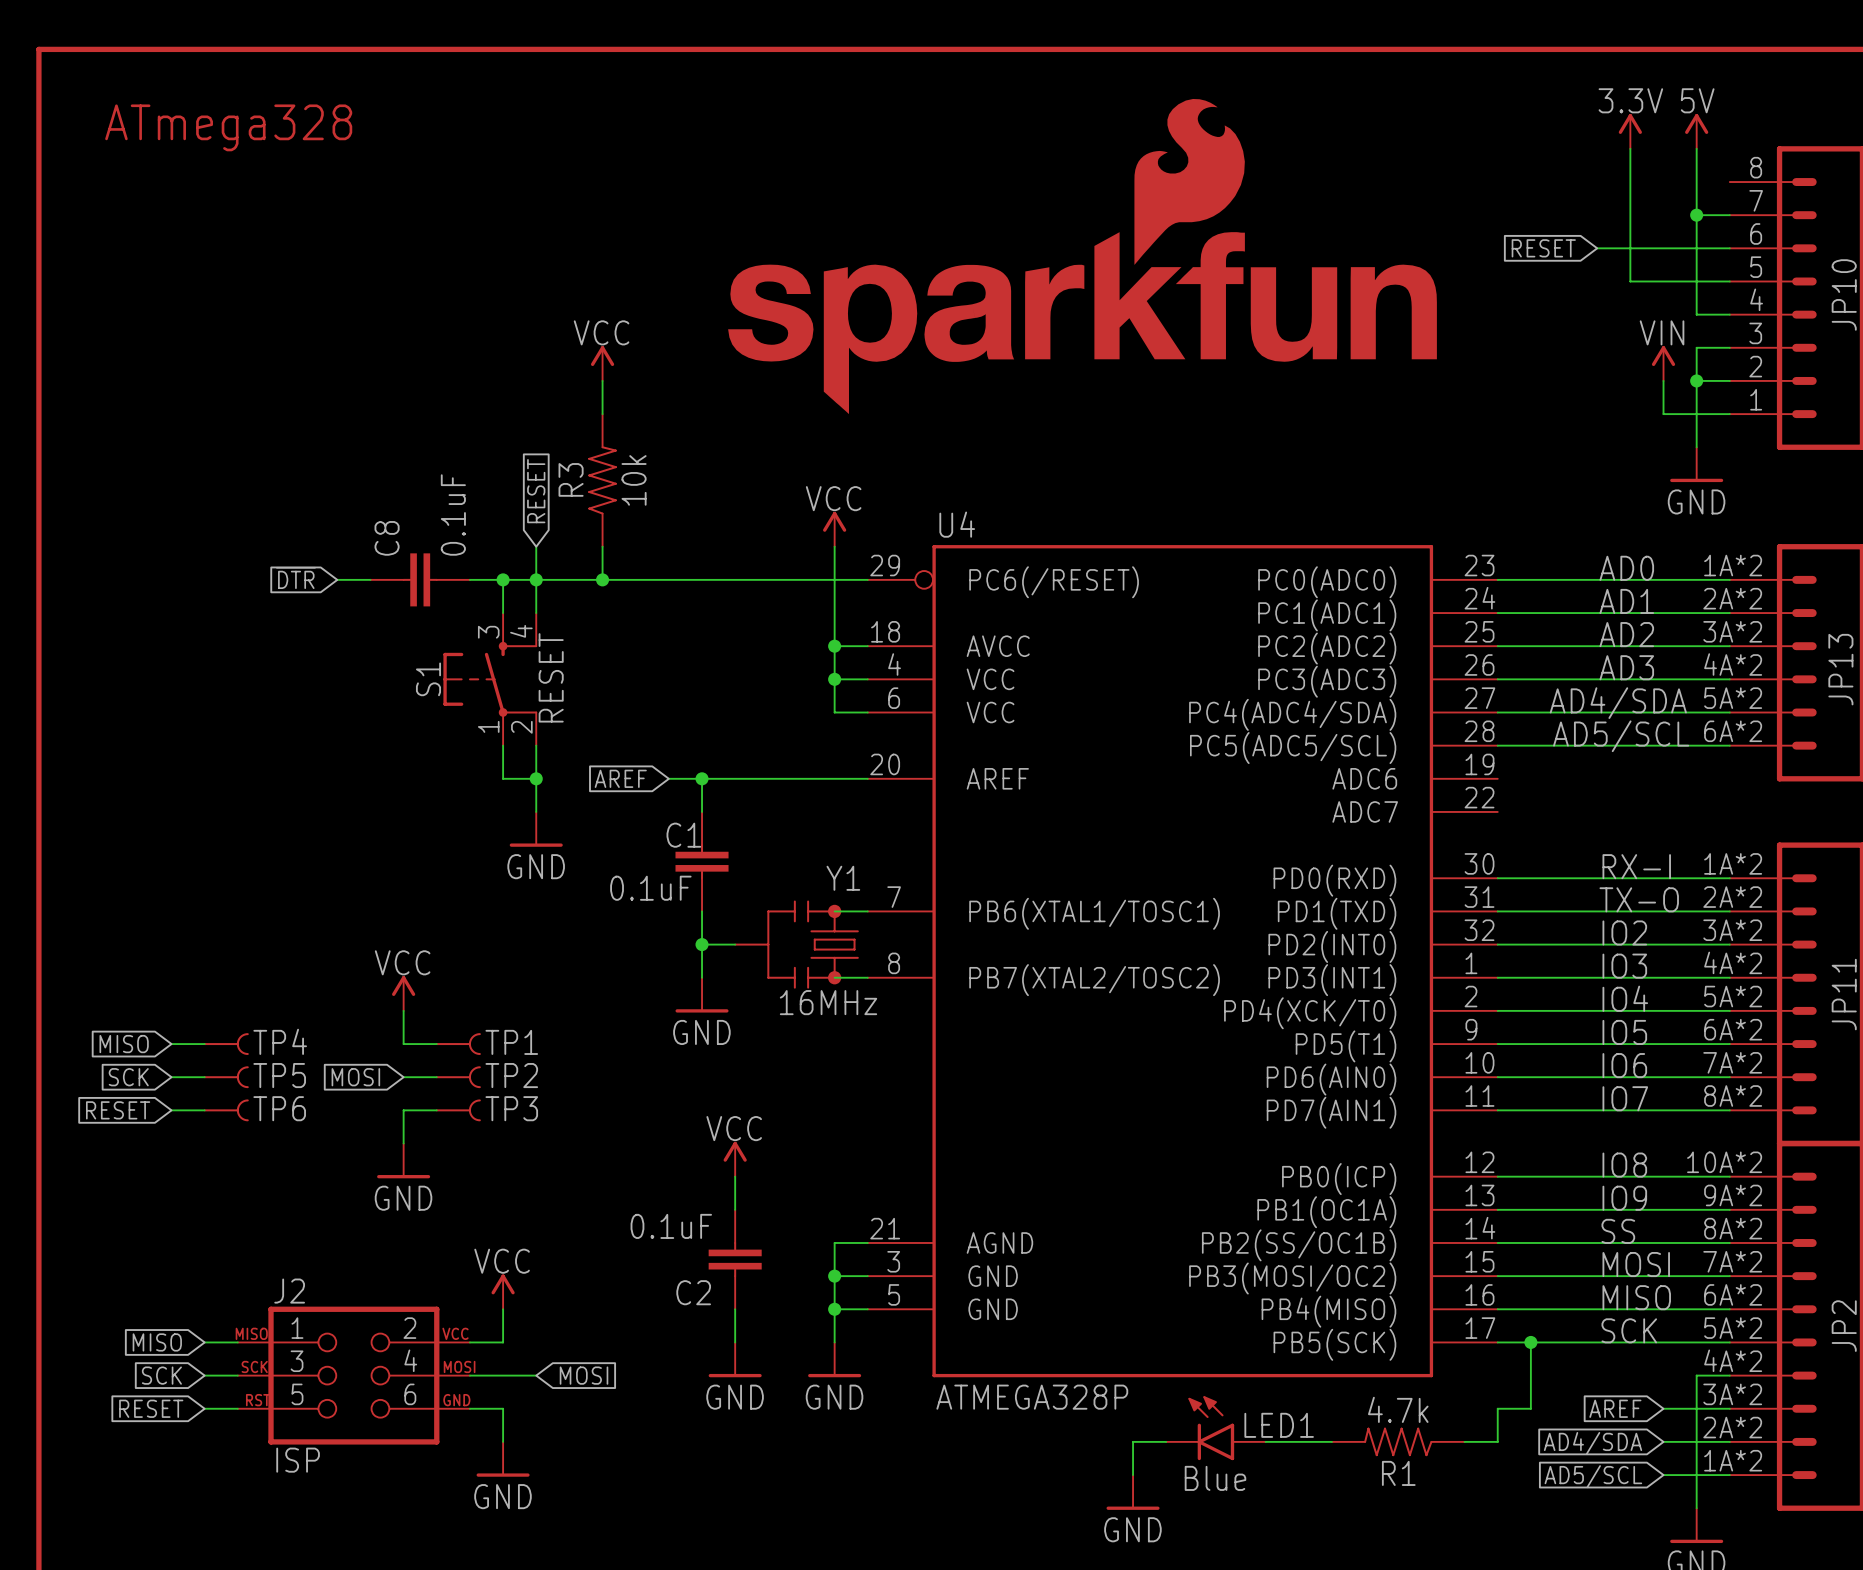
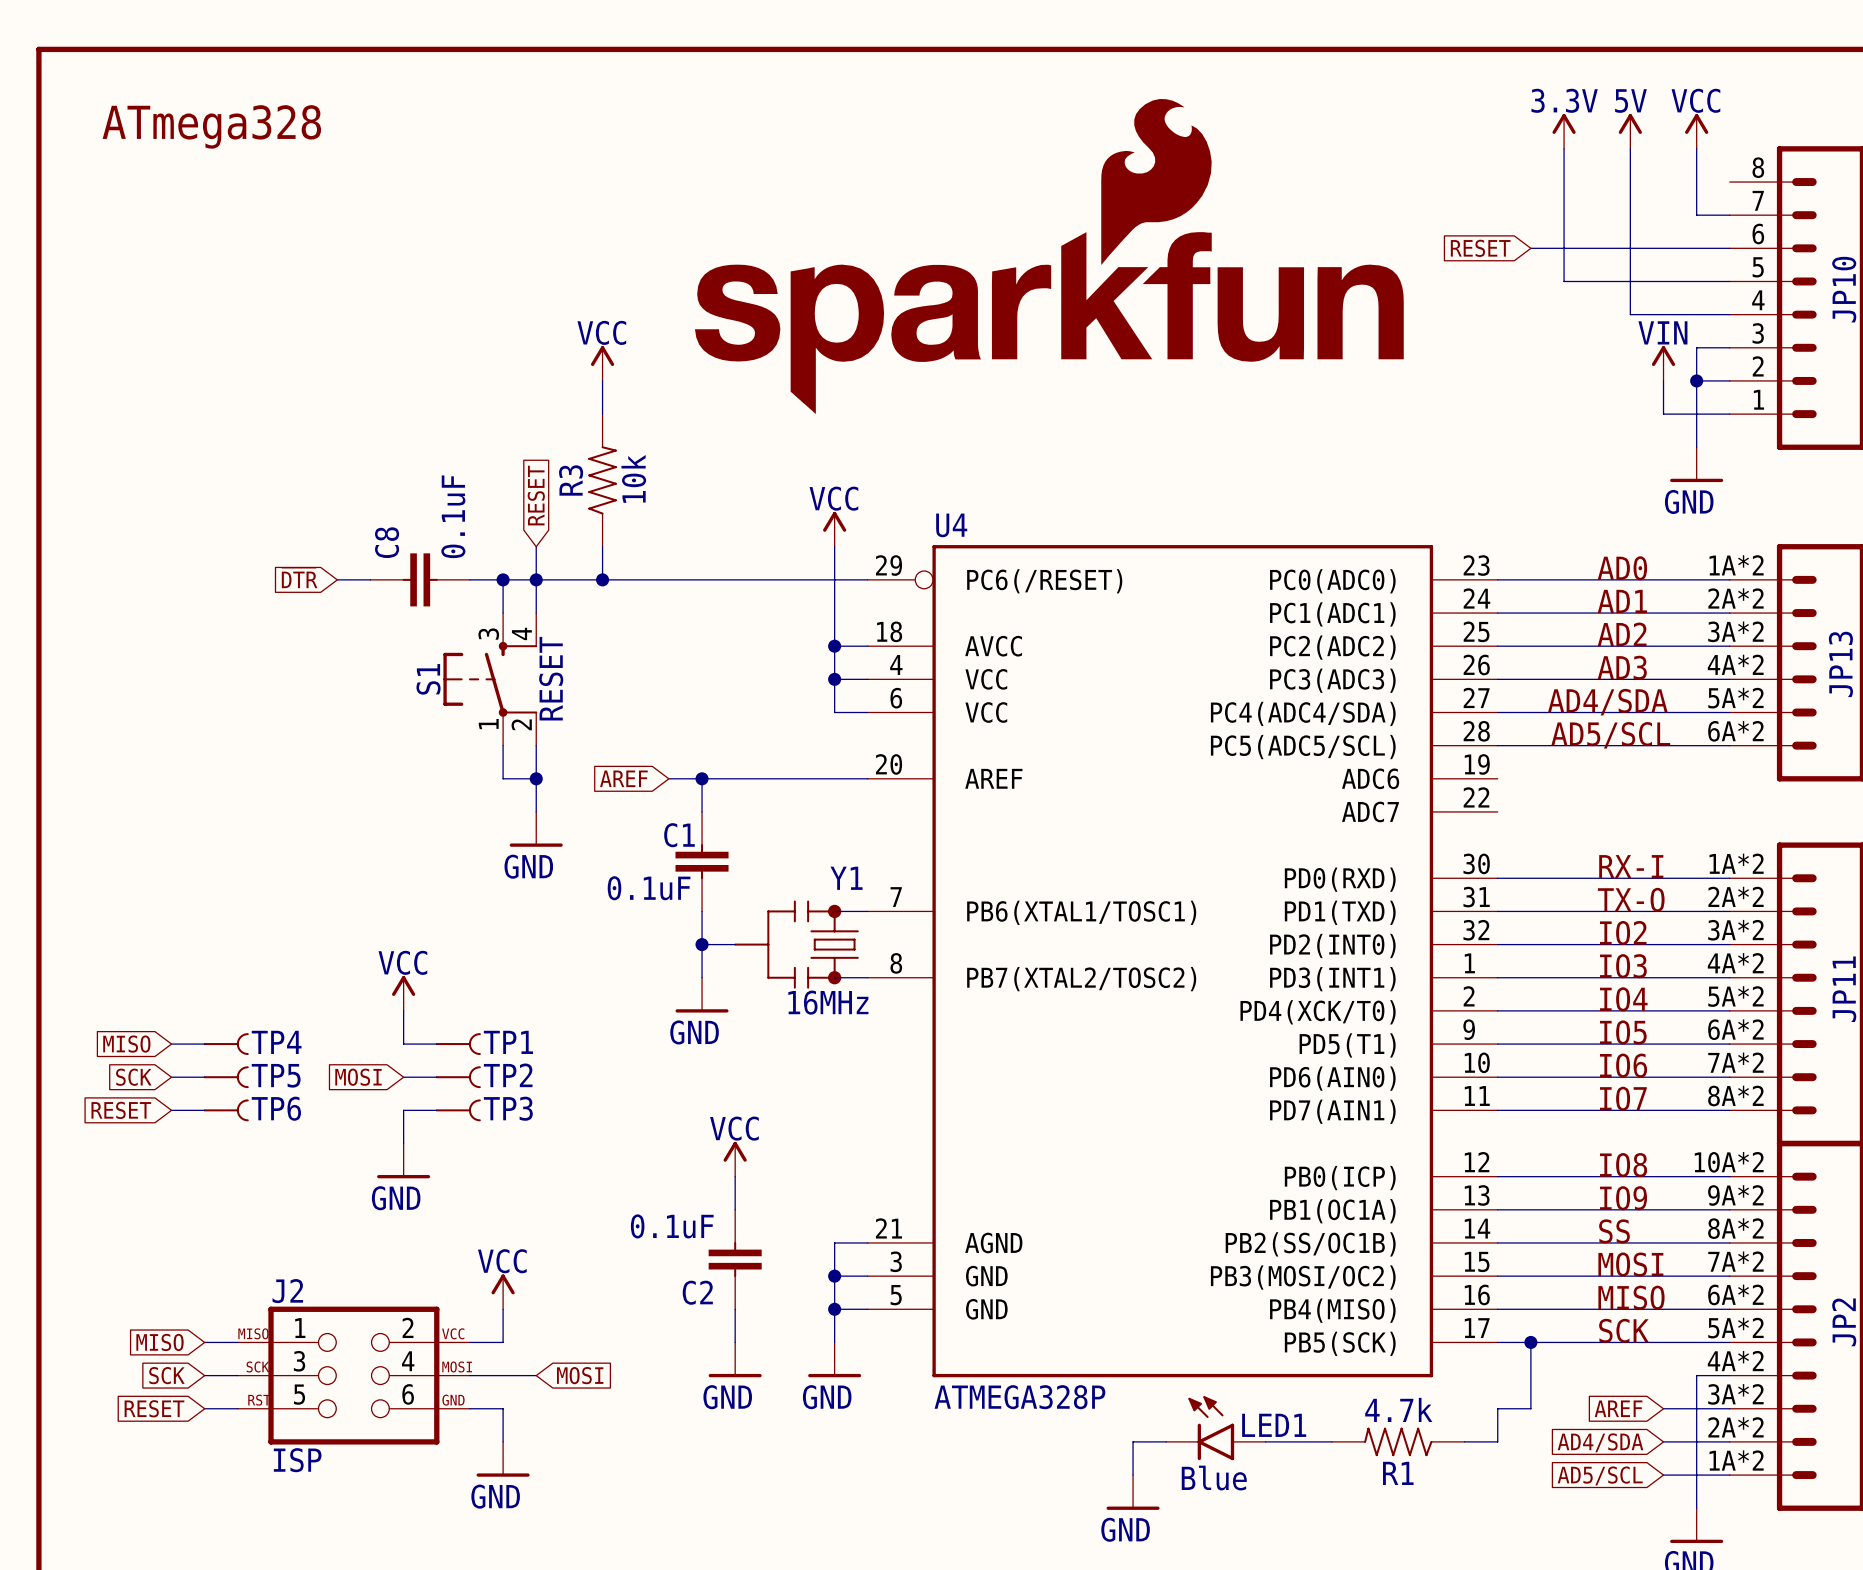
power symbol: none -> 3.3V (1564, 131)
power symbol: 3.3V (1630, 131) -> 5V (1630, 131)
power symbol: 5V (1696, 131) -> VCC (1696, 131)
part position: (1189, 181) -> (1156, 181)
wire: (1696, 215) (1696, 314) -> (1564, 148) (1564, 281) (1630, 281) (1630, 314) (1696, 314)
junction: (1696, 215) -> none
wire: none -> (1530, 248) (1597, 248)
global label position: RESET (1543, 248) -> RESET (1480, 248)
part position: (1082, 323) -> (1049, 323)

